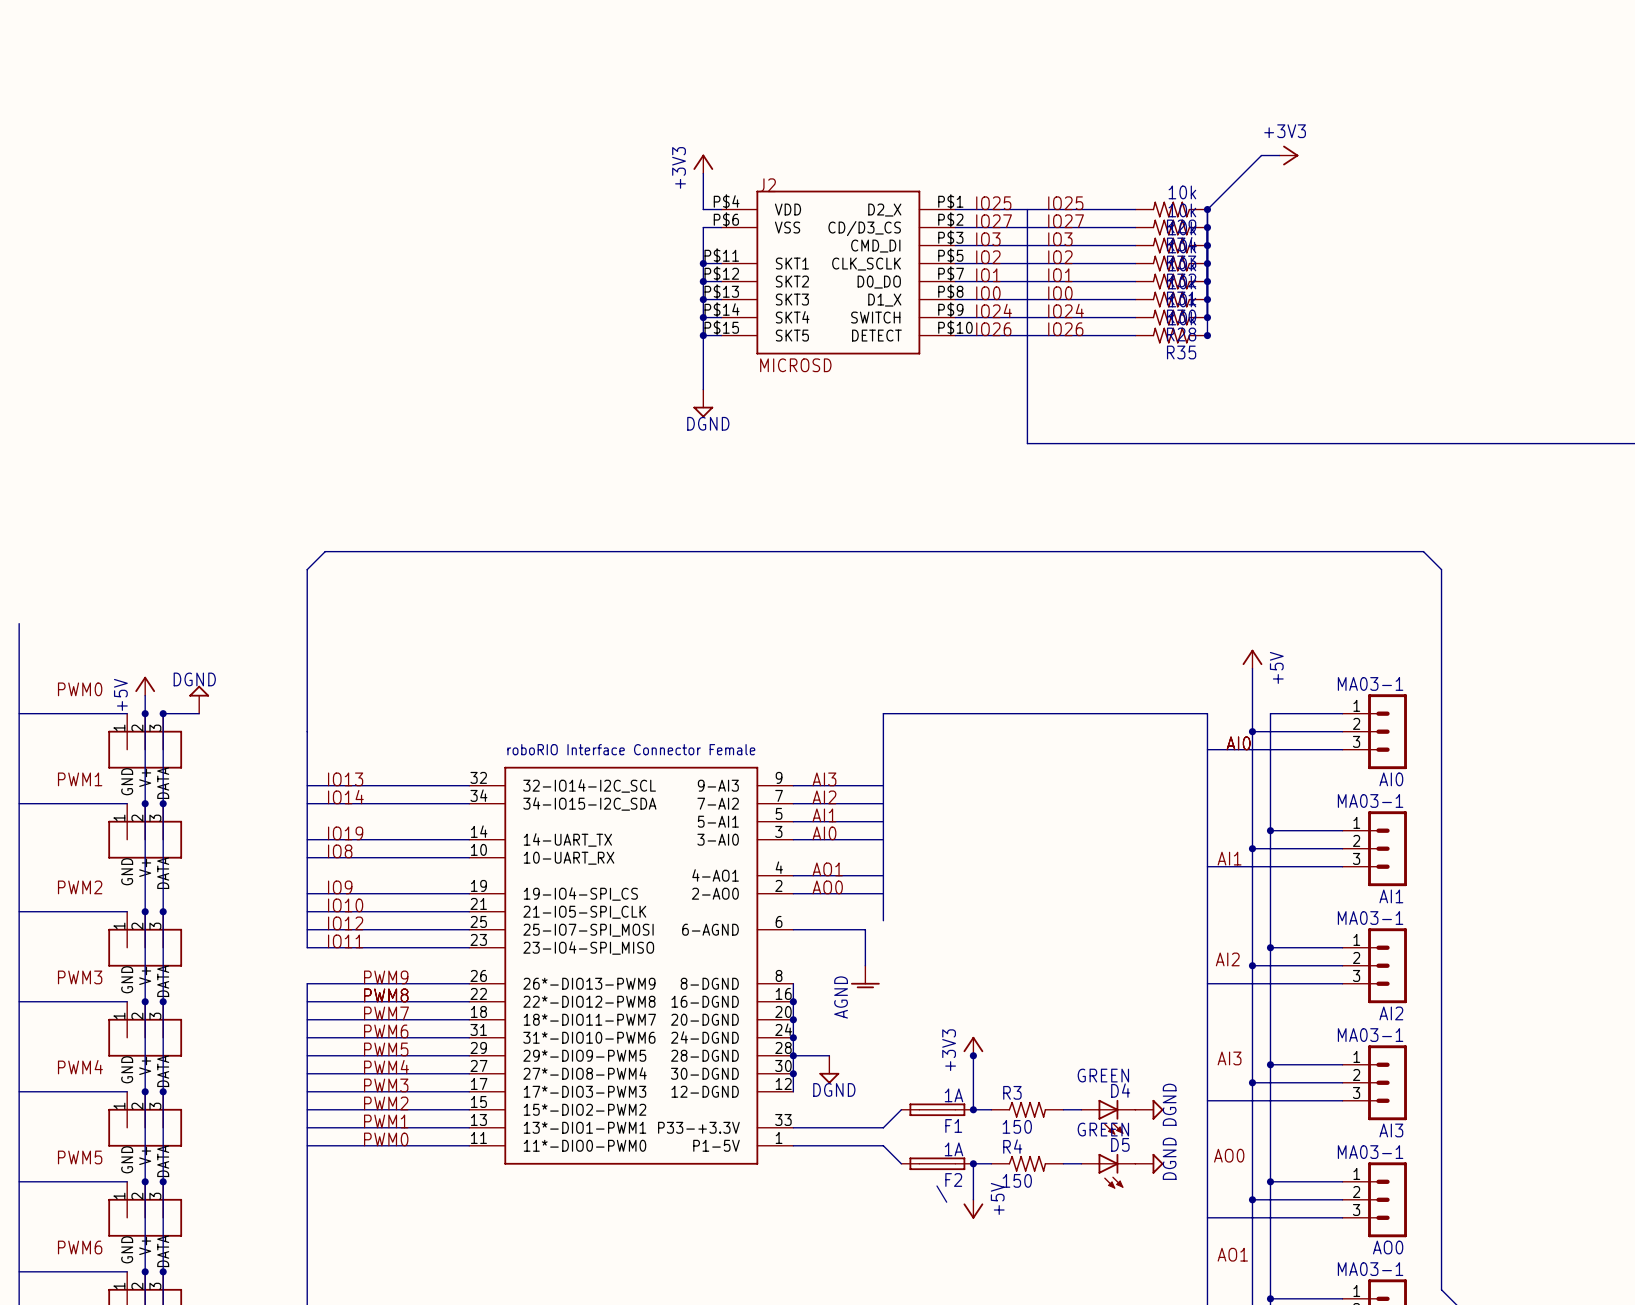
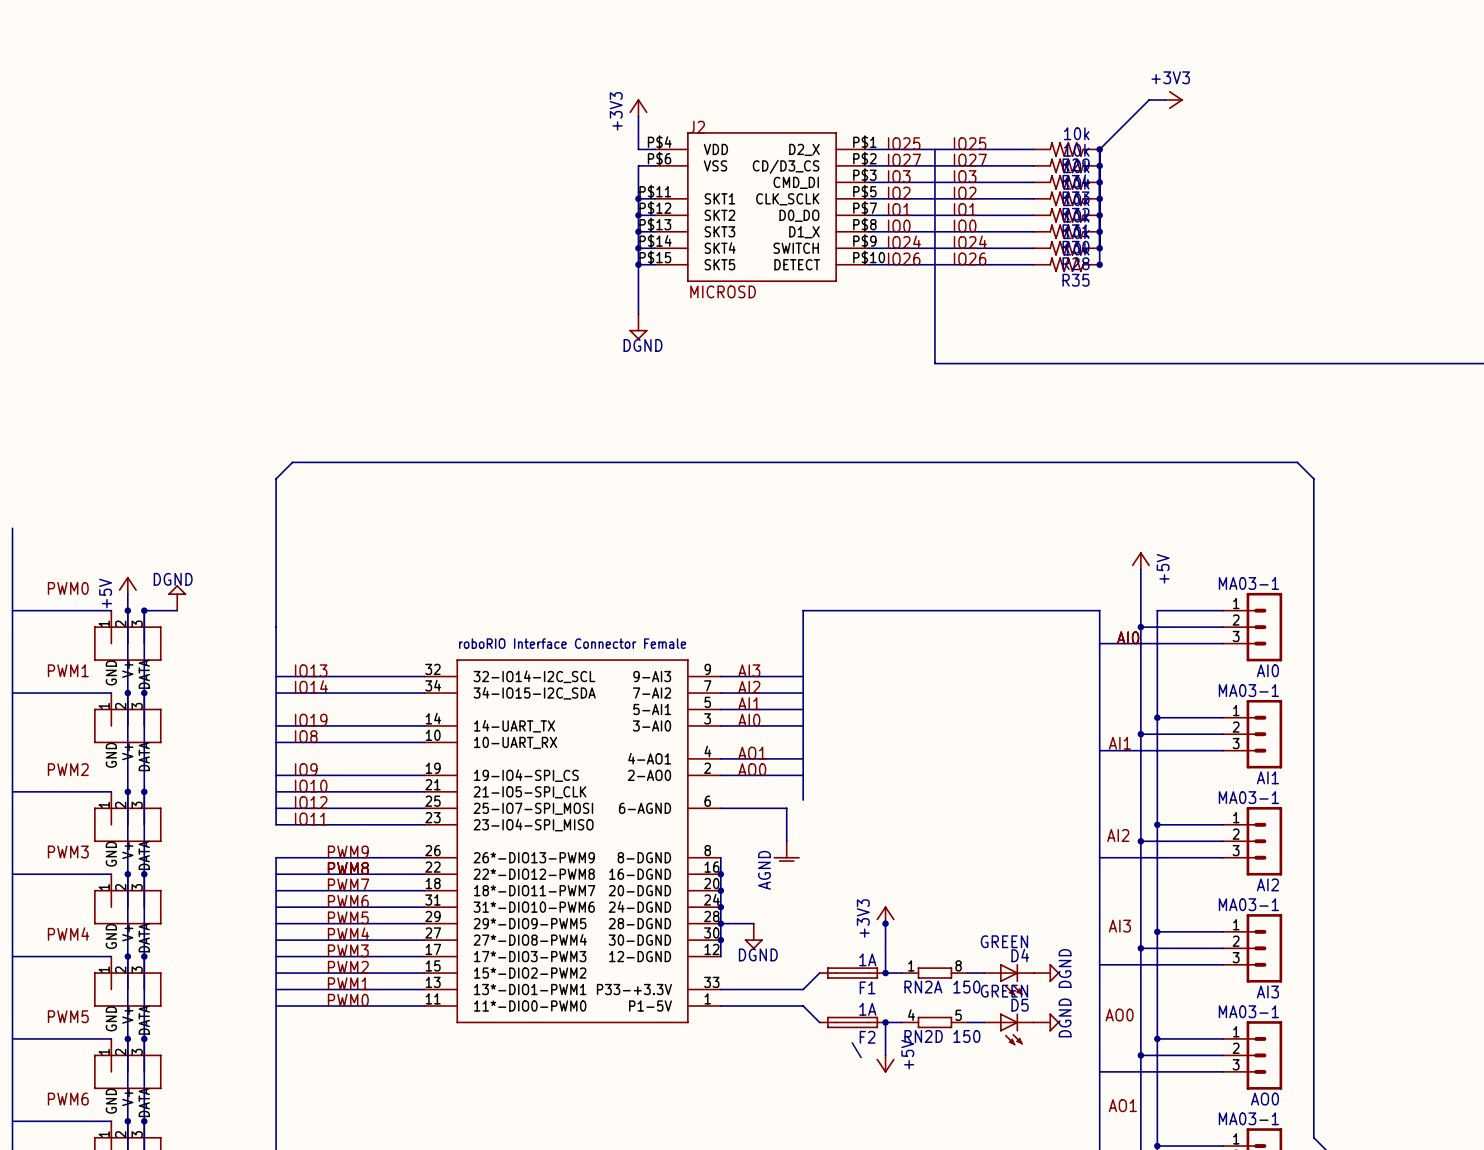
R3: 150 (1027, 1109) -> none
RN2A: none -> 150 (934, 973)
R4: 150 (1027, 1163) -> none
RN2D: none -> 150 (934, 1022)

